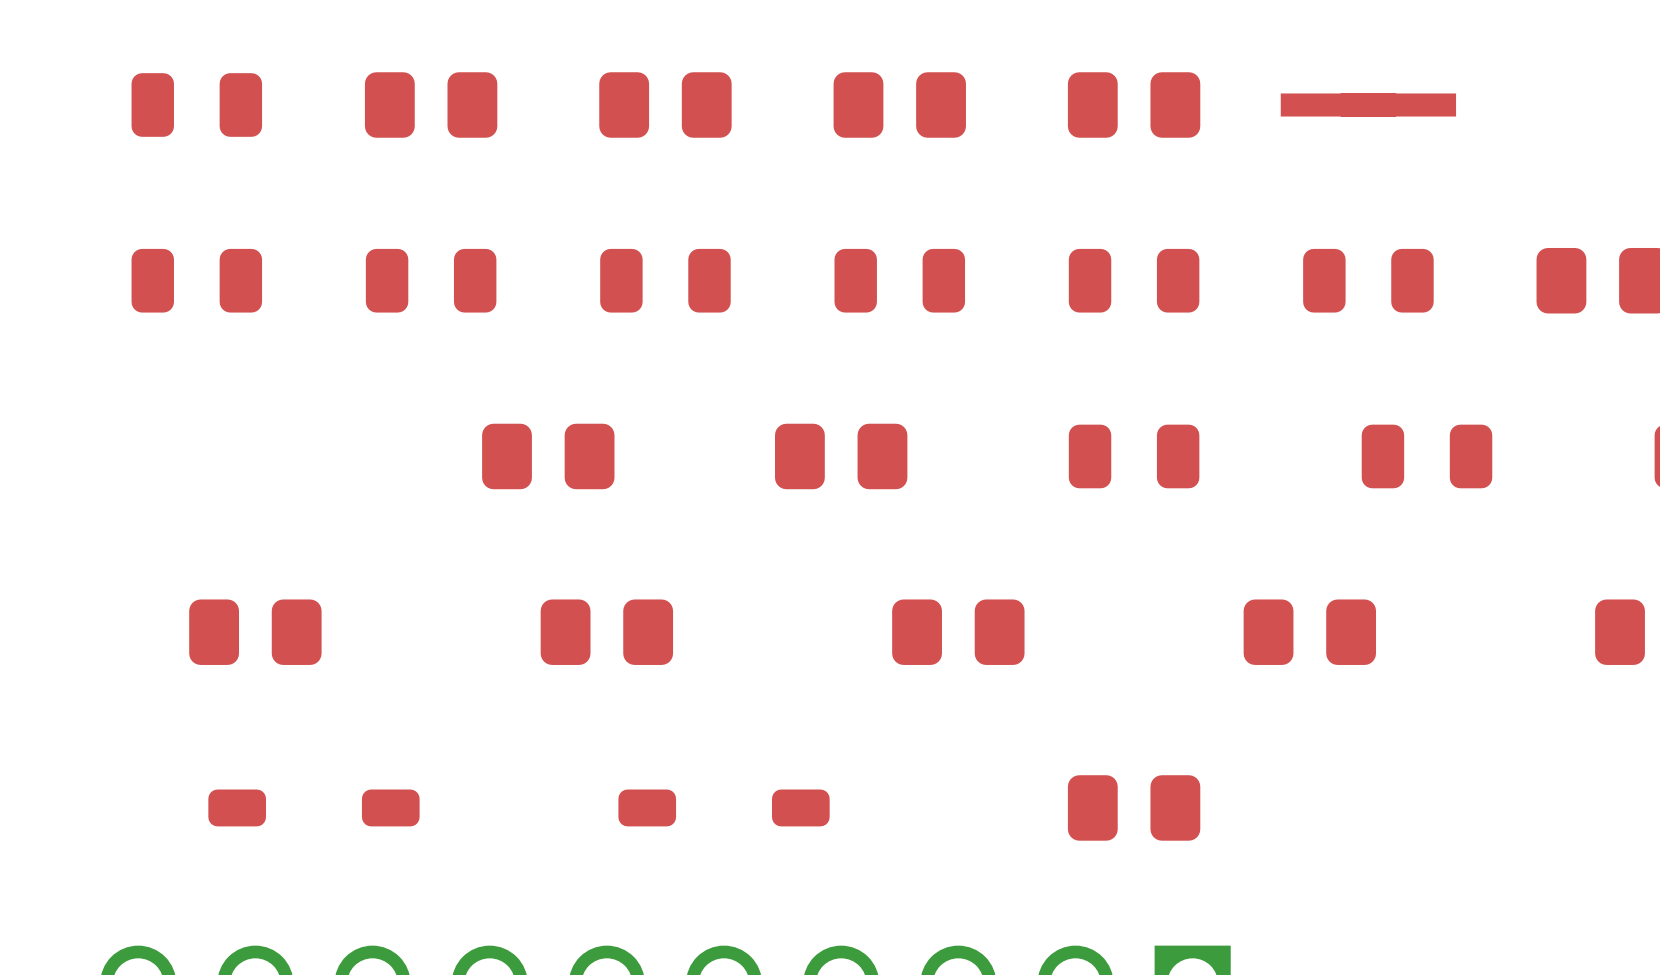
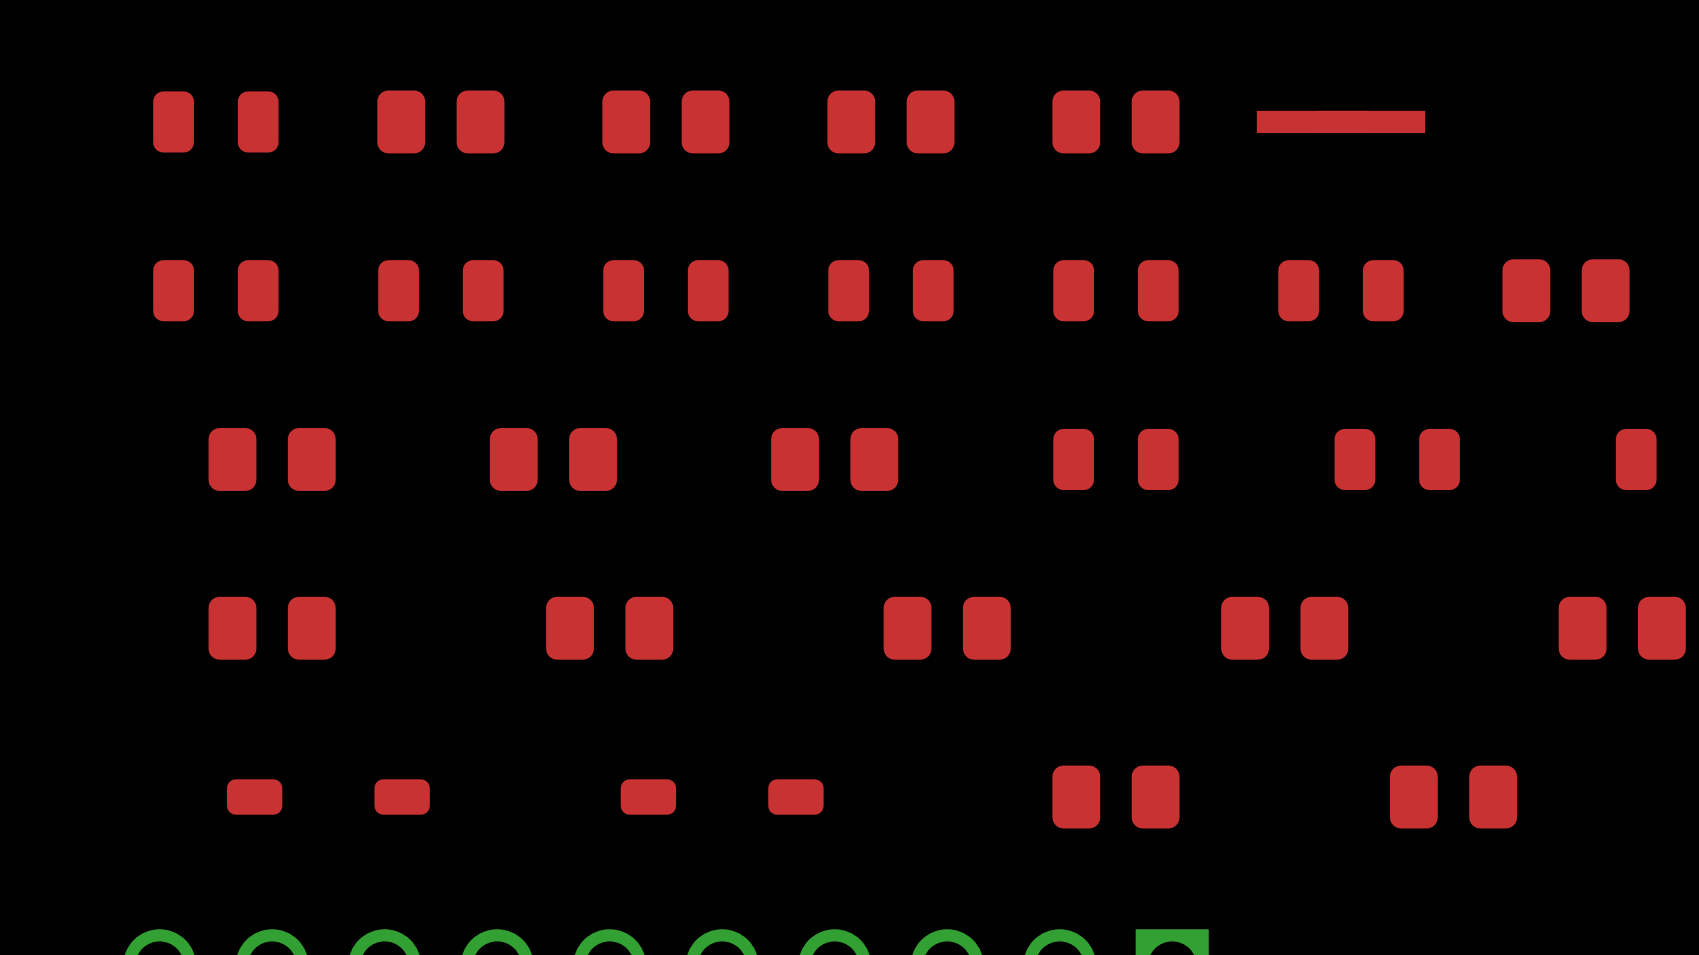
part: none -> (272, 459)
part: none -> (1453, 797)

